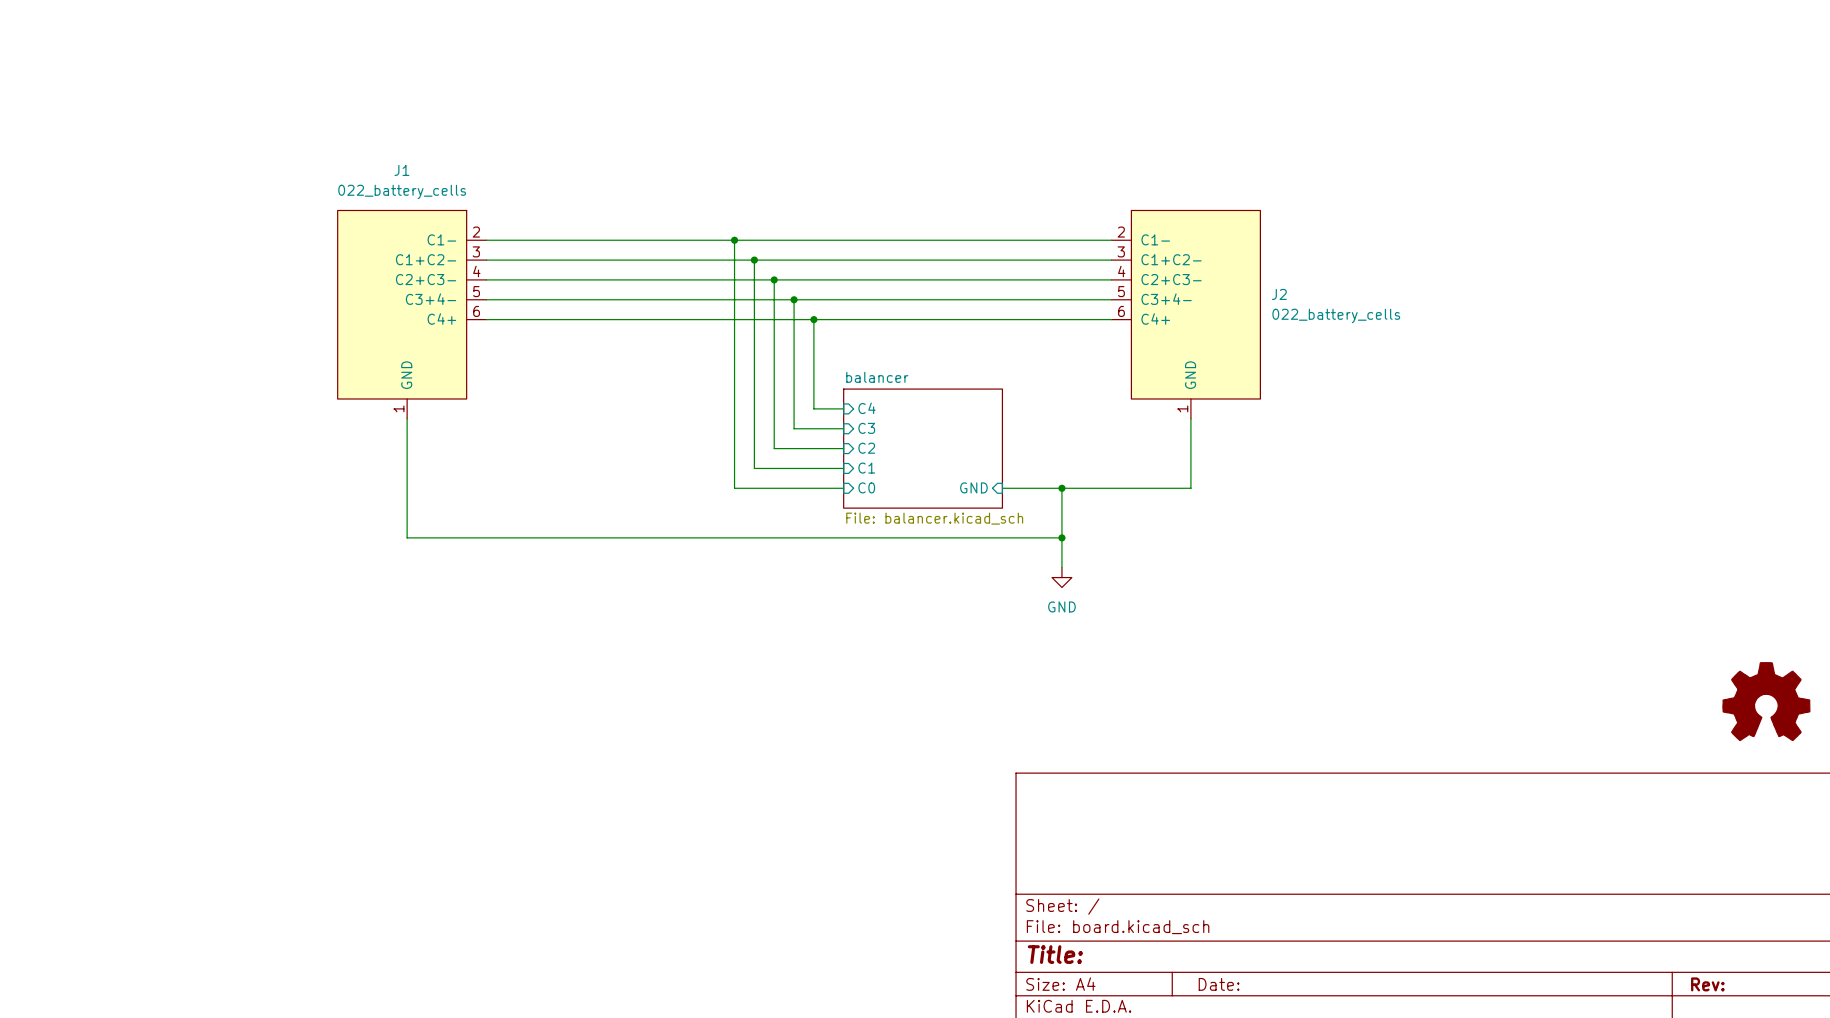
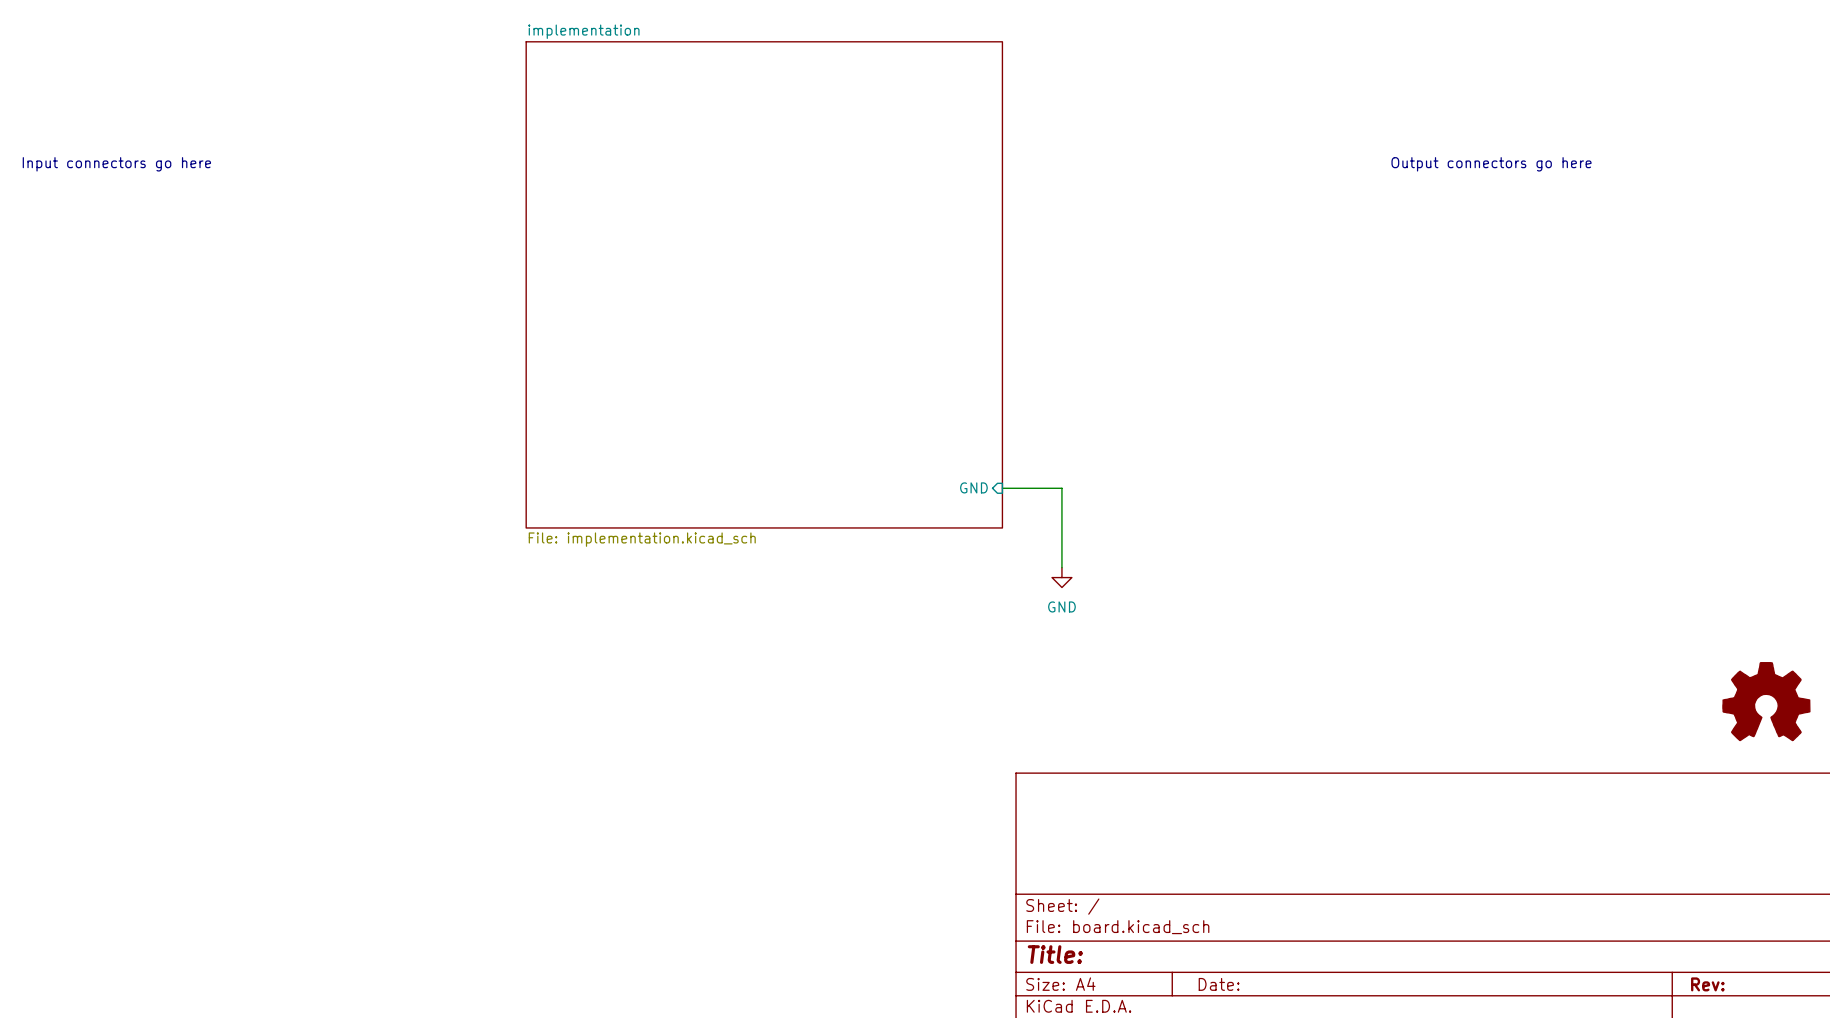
text: none -> Input connectors go here (116, 164)
text: none -> Output connectors go here (1491, 164)
wire: (486, 240) (1111, 240) -> none
wire: (734, 240) (734, 488) (843, 488) -> none
junction: (734, 240) -> none
wire: (486, 260) (1111, 260) -> none
wire: (754, 260) (754, 468) (843, 468) -> none
junction: (754, 260) -> none
wire: (486, 279) (1111, 279) -> none
wire: (774, 279) (774, 448) (843, 448) -> none
junction: (774, 279) -> none
sheet implementation: none -> File: implementation.kicad_sch (764, 284)
wire: (486, 299) (1111, 299) -> none
wire: (794, 299) (794, 428) (843, 428) -> none
junction: (794, 299) -> none
J1: 022_battery_cells (412, 314) -> none
J2: 022_battery_cells (1185, 314) -> none
wire: (486, 319) (1111, 319) -> none
wire: (813, 319) (813, 408) (843, 408) -> none
junction: (813, 319) -> none
sheet pin: C4 (866, 408) -> none
wire: (407, 418) (407, 537) (1061, 537) -> none
wire: (1190, 418) (1190, 488) (1061, 488) -> none
sheet pin: C3 (866, 428) -> none
sheet pin: C2 (866, 448) -> none
sheet balancer: File: balancer.kicad_sch (923, 448) -> none
sheet pin: C1 (866, 468) -> none
sheet pin: C0 (866, 487) -> none
junction: (1061, 488) -> none
junction: (1061, 537) -> none

